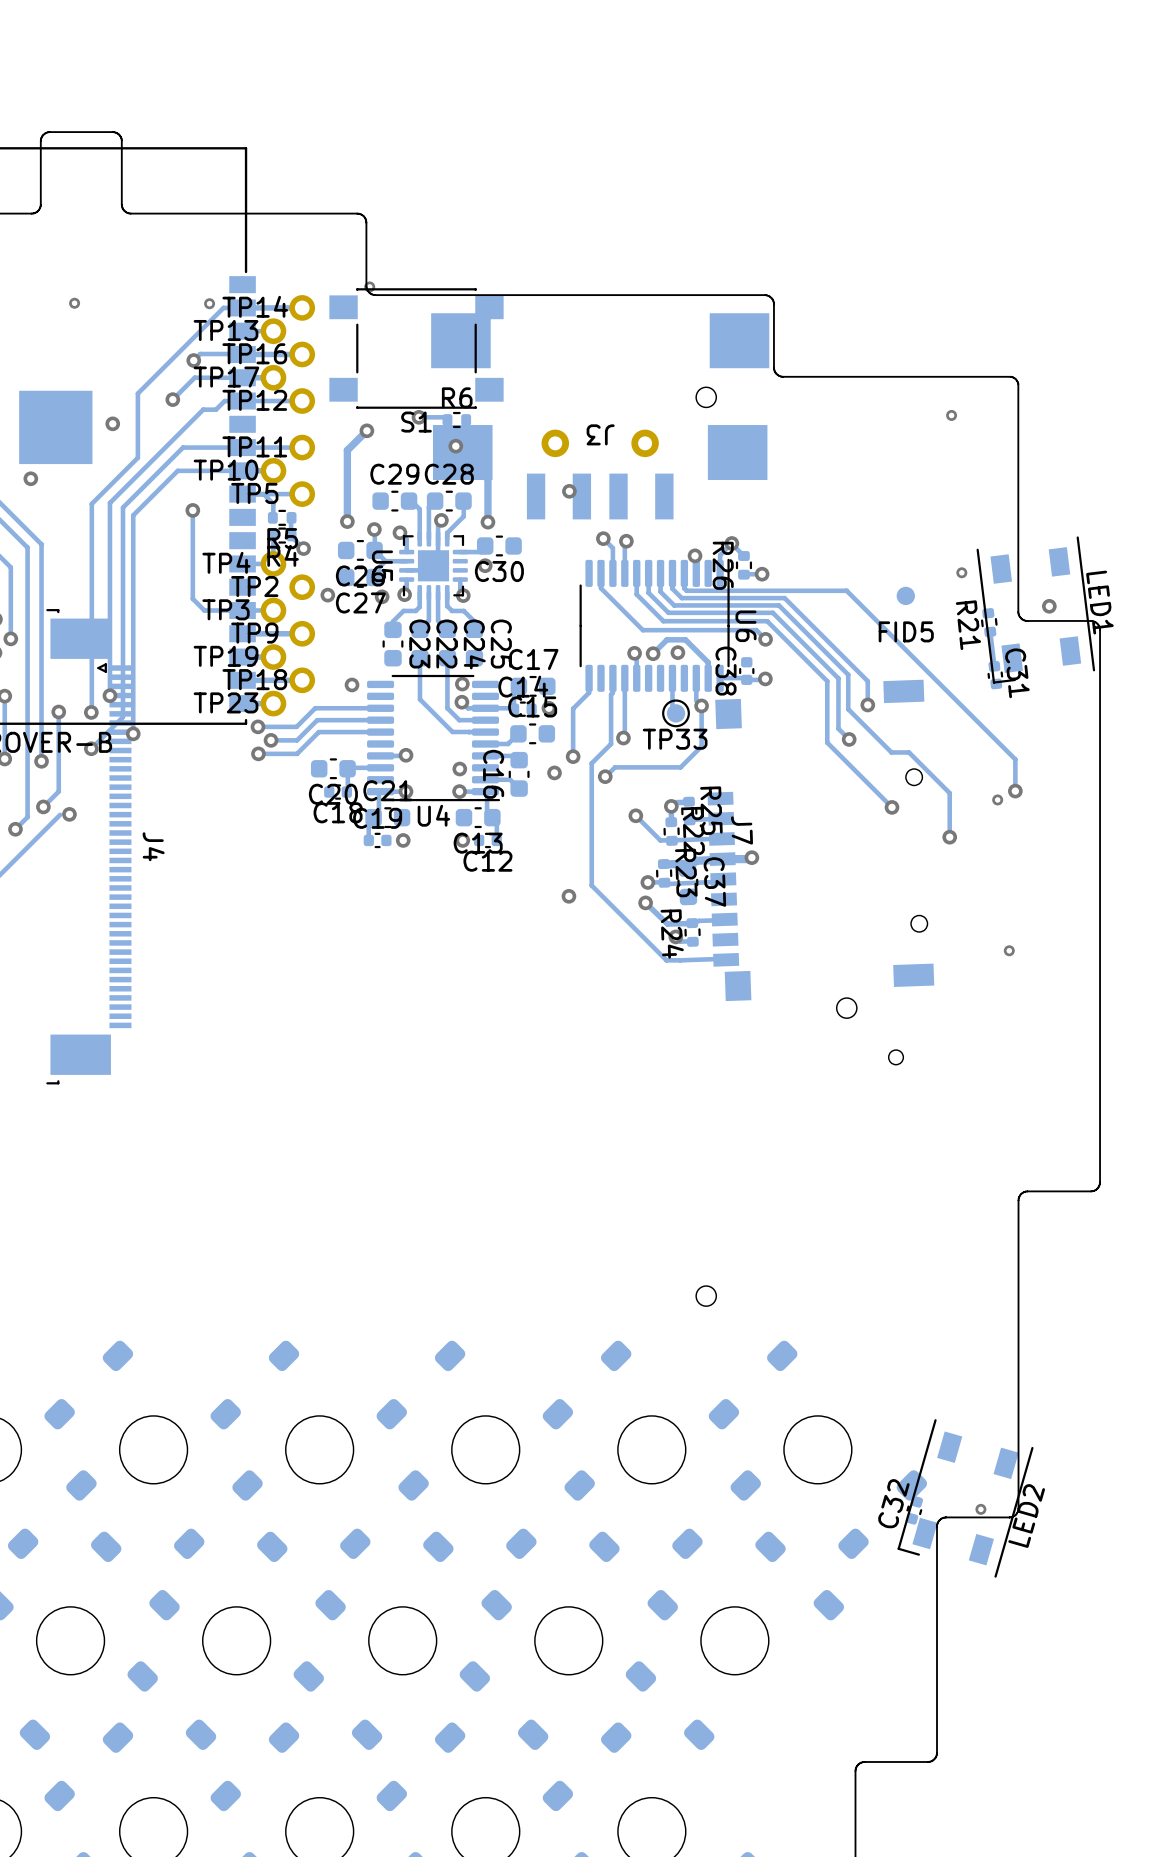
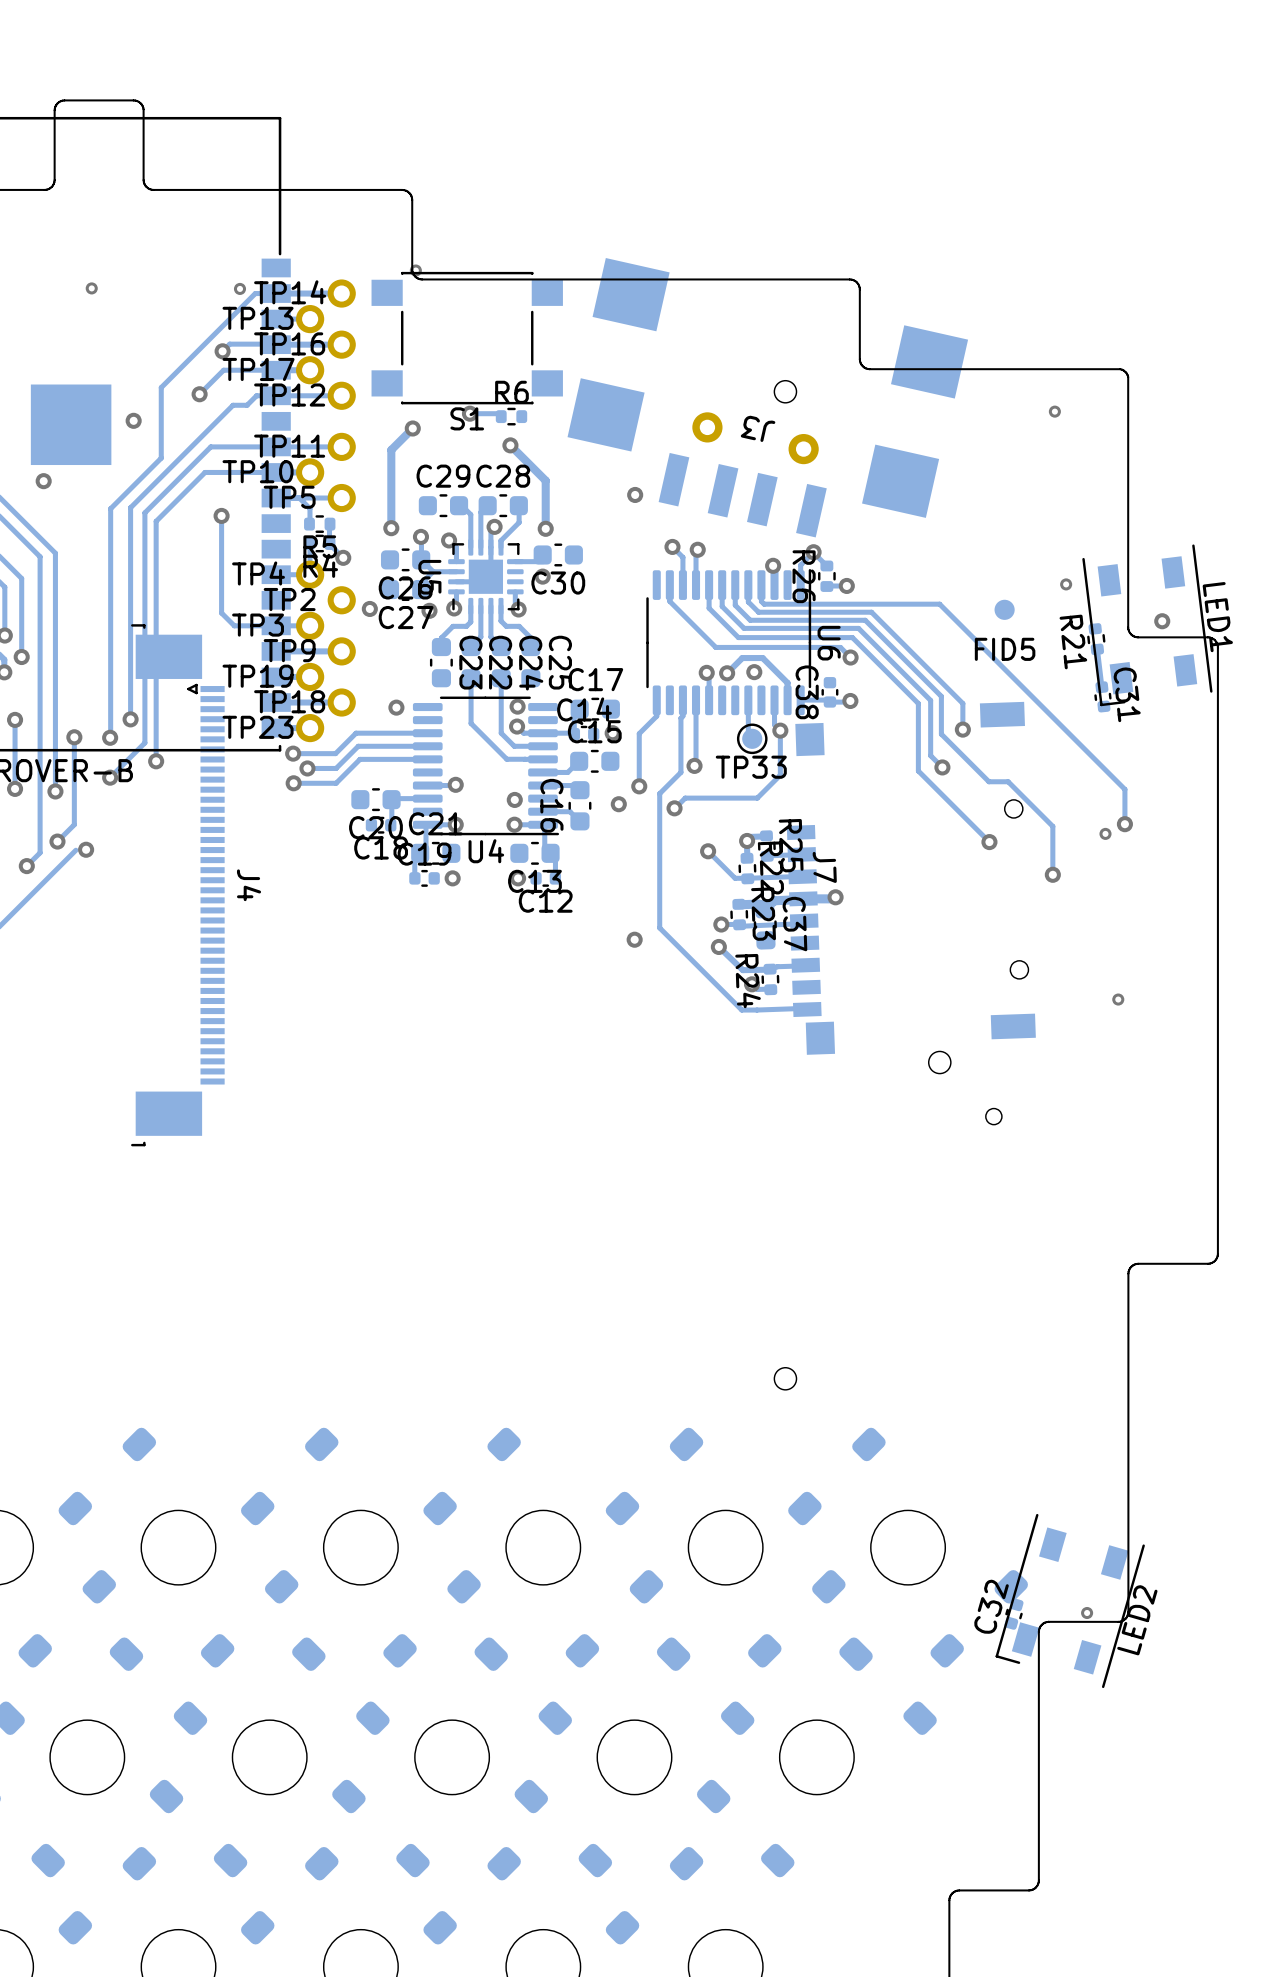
J3 rotation: 0° (600, 416) -> 12.7° clockwise (767, 397)
J4 position: (88, 846) -> (177, 885)

